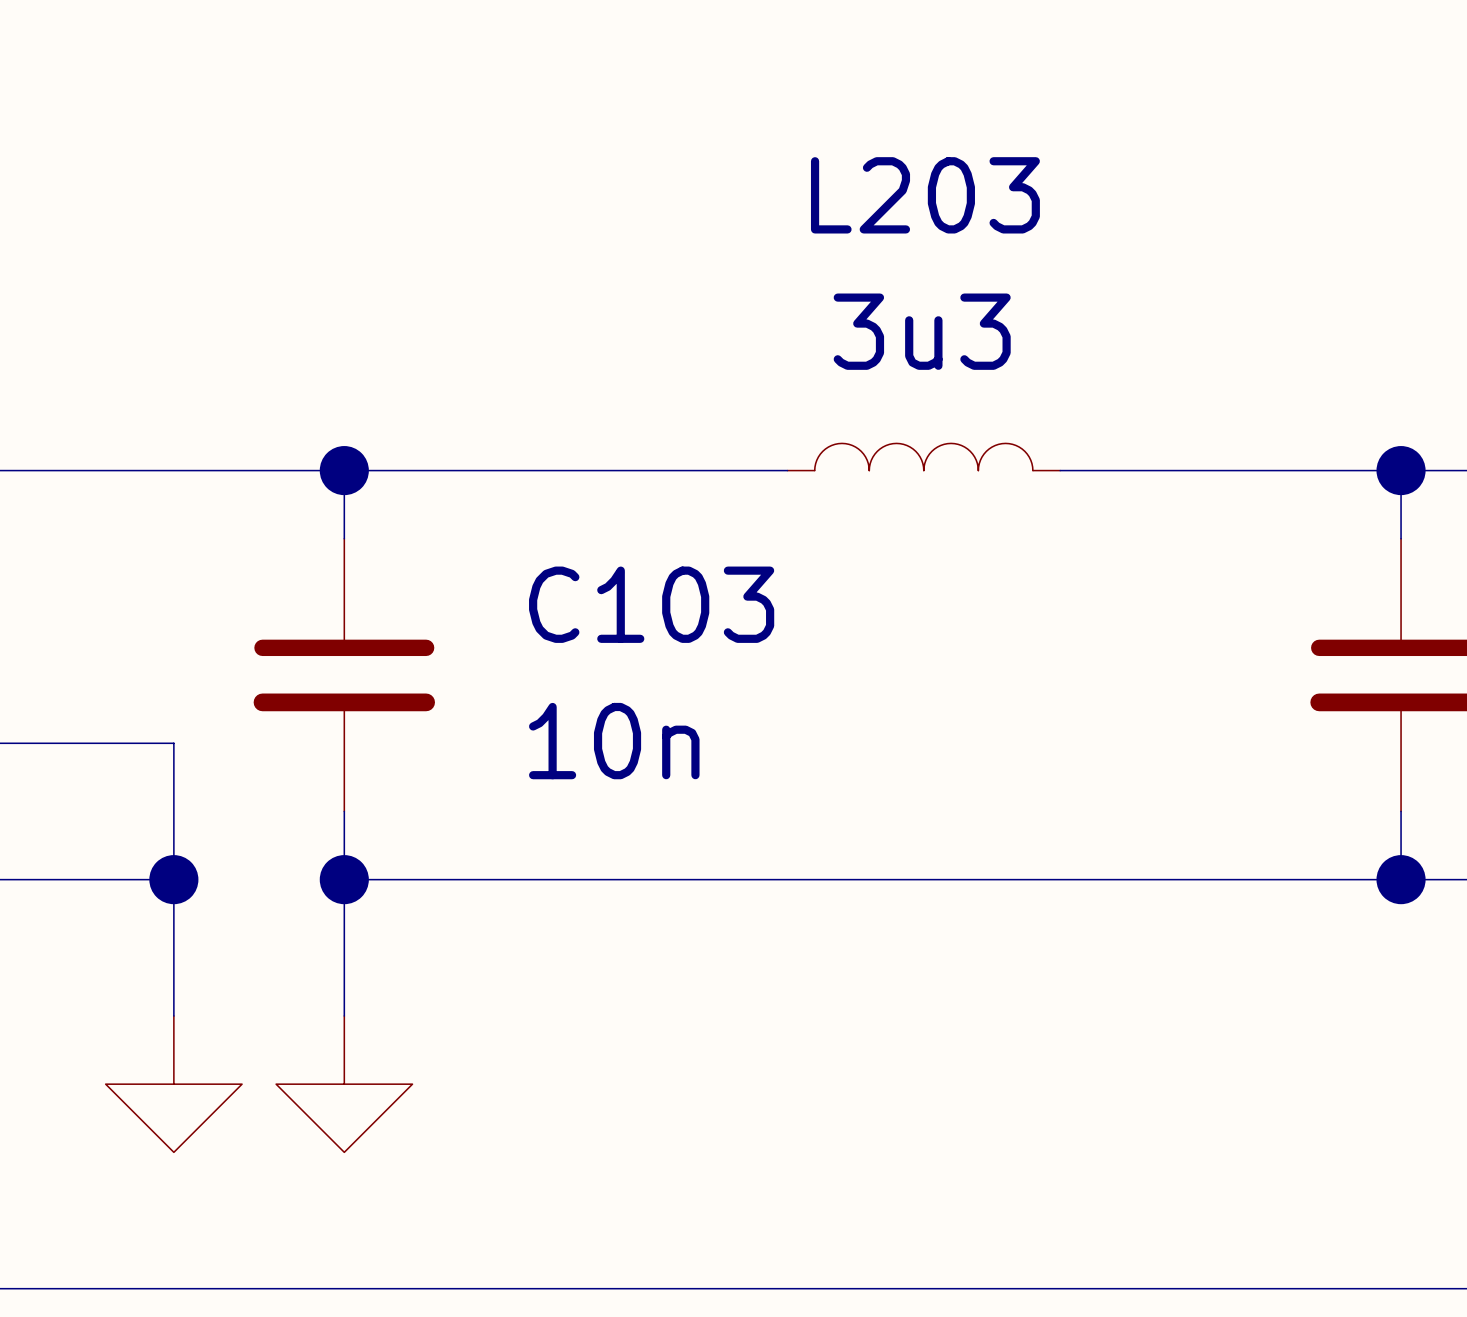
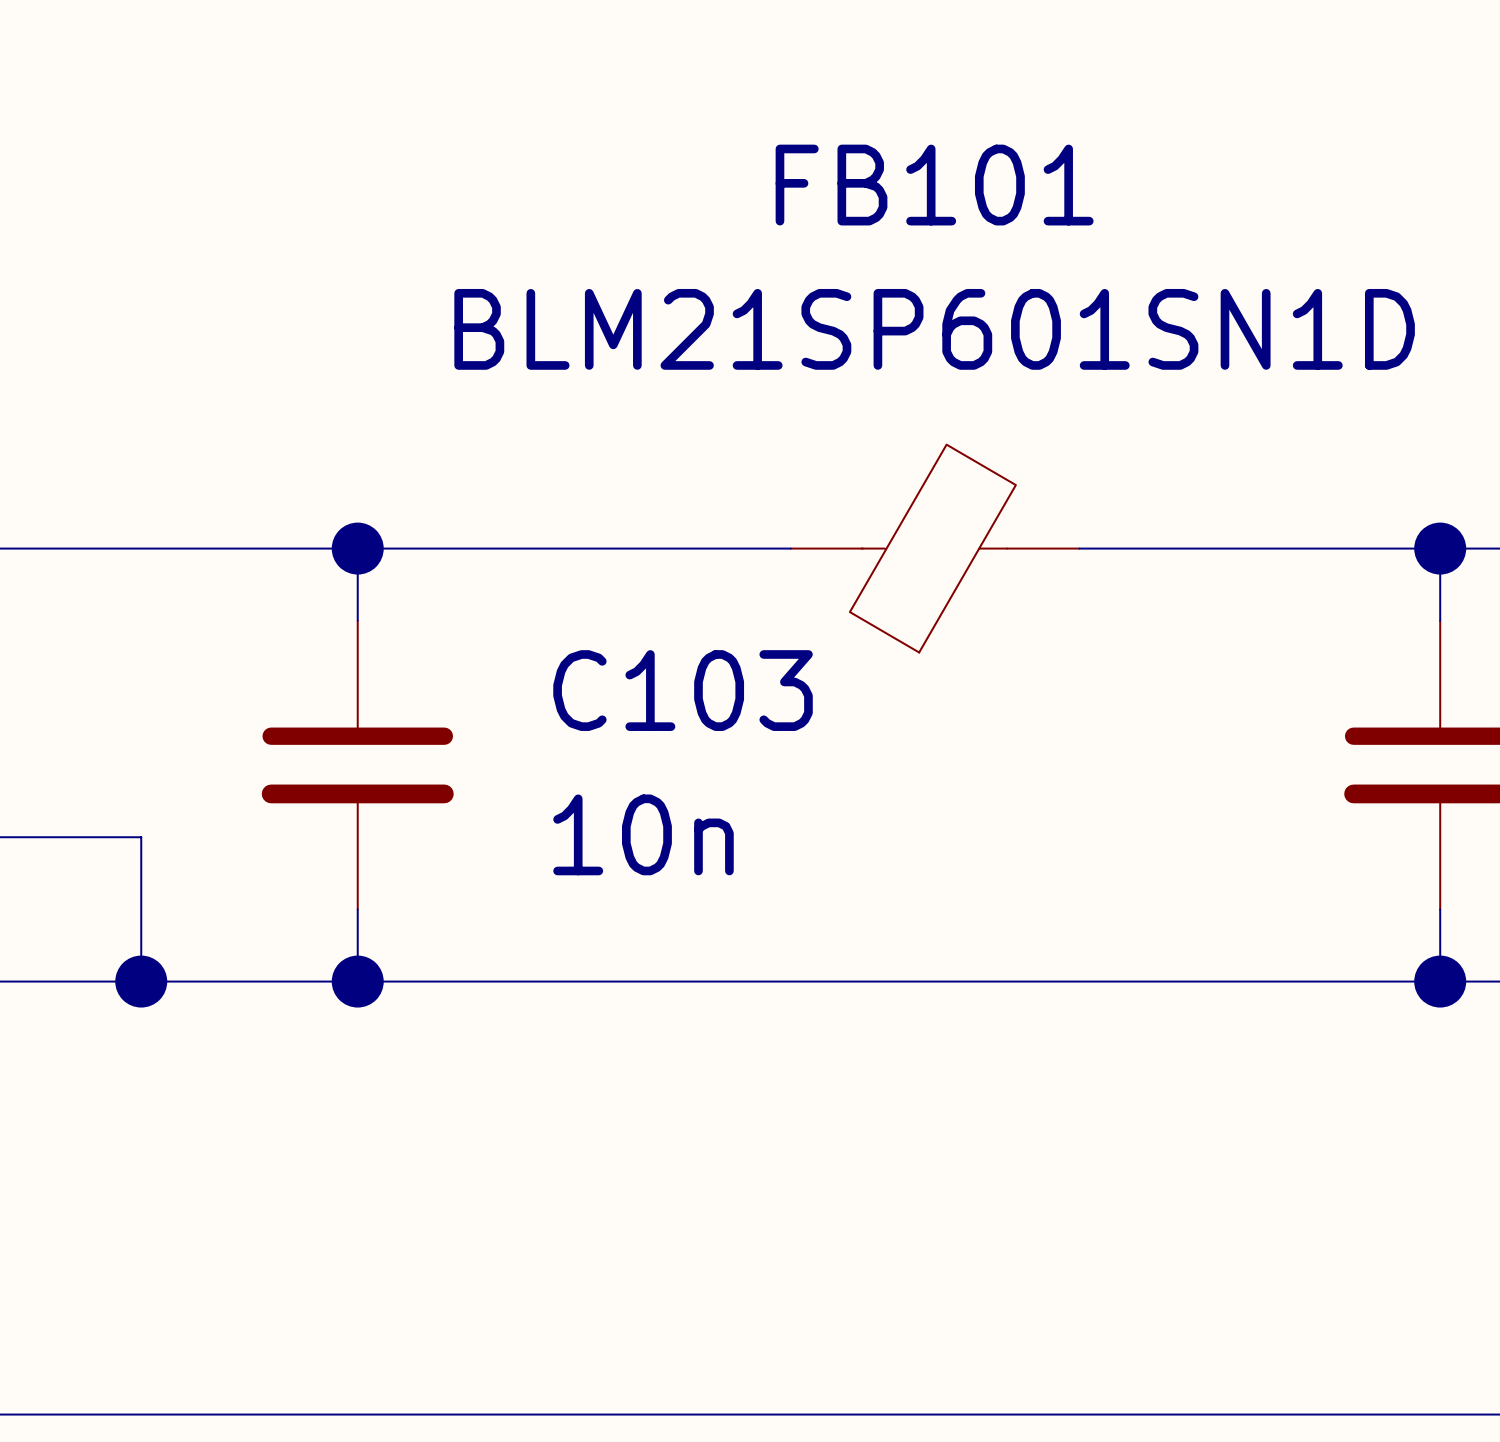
L203: 3u3 (923, 457) -> none
wire: (344, 470) (344, 538) -> (357, 548) (357, 620)
junction position: (344, 470) -> (357, 548)
FB101: none -> BLM21SP601SN1D (935, 548)
C103 position: (344, 675) -> (357, 765)
wire: (344, 811) (344, 1015) -> none
wire: none -> (357, 909) (357, 981)
wire: (173, 879) (173, 1015) -> (141, 981) (321, 981)
junction position: (344, 879) -> (357, 981)
power symbol: (173, 1084) -> none
power symbol: (344, 1084) -> none

